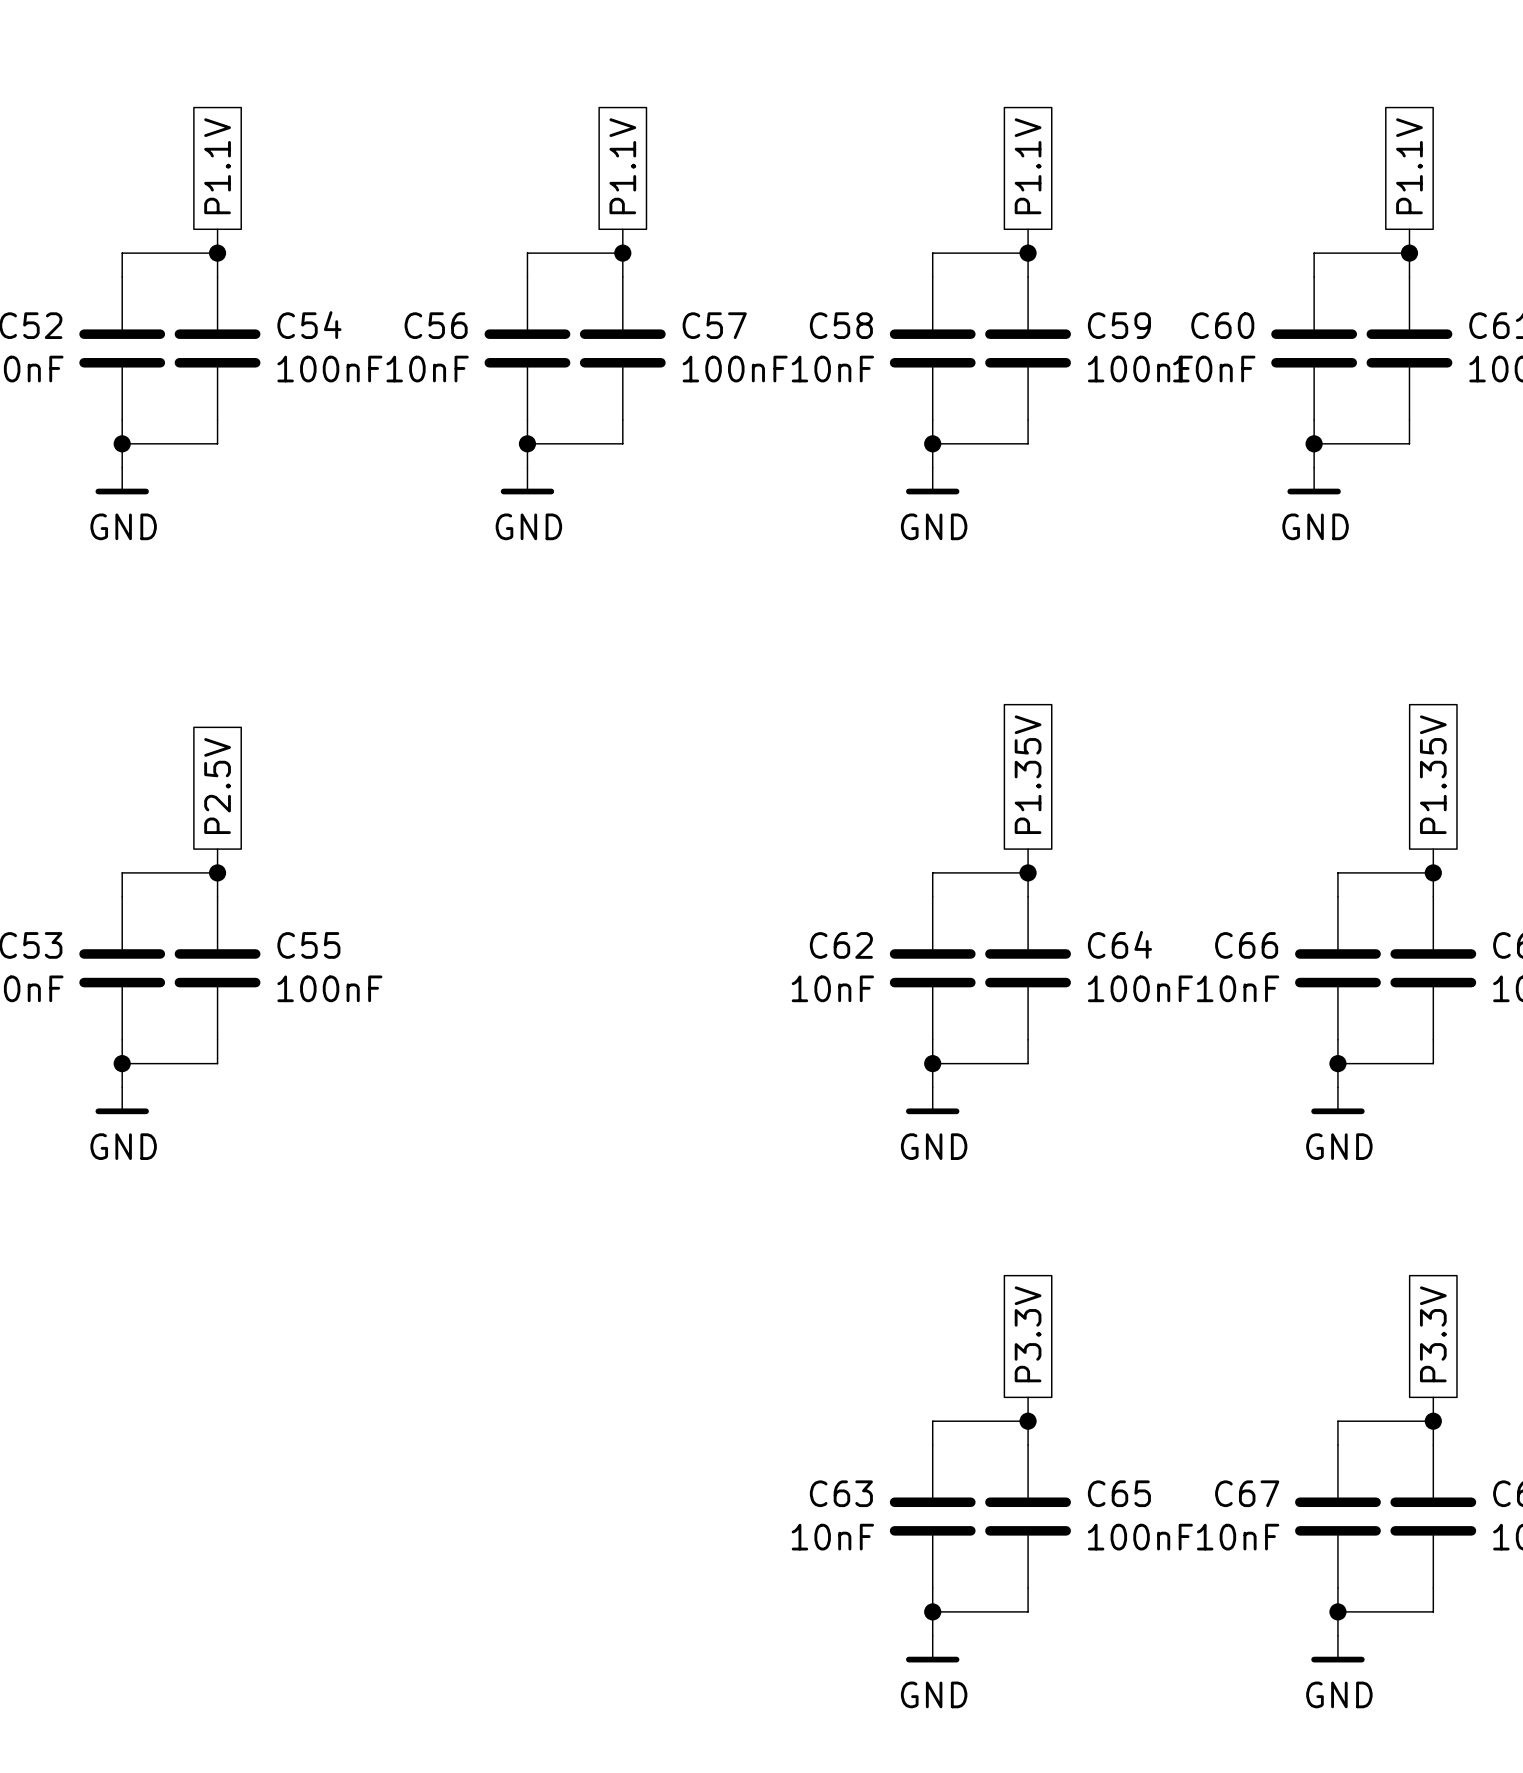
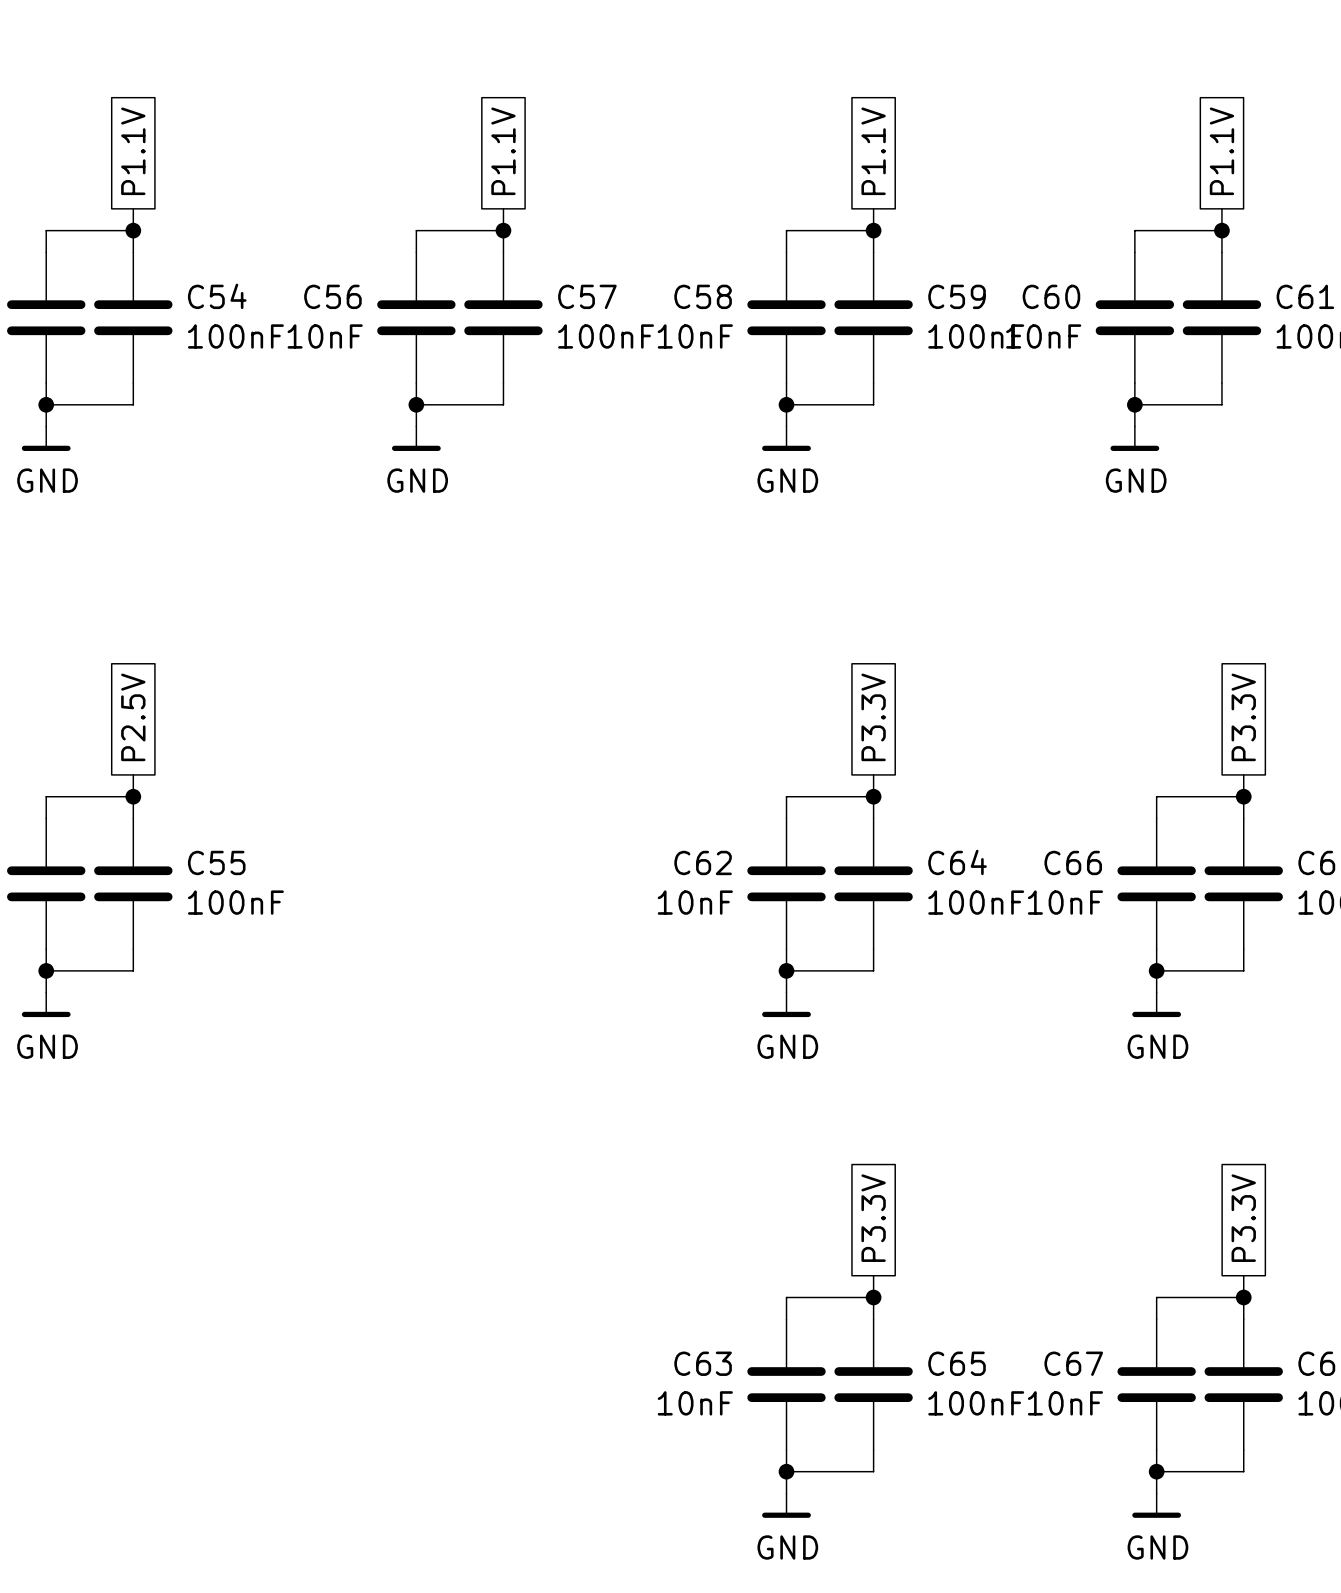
global label: P1.35V (1028, 774) -> P3.3V (873, 717)
global label: P1.35V (1433, 774) -> P3.3V (1243, 717)

